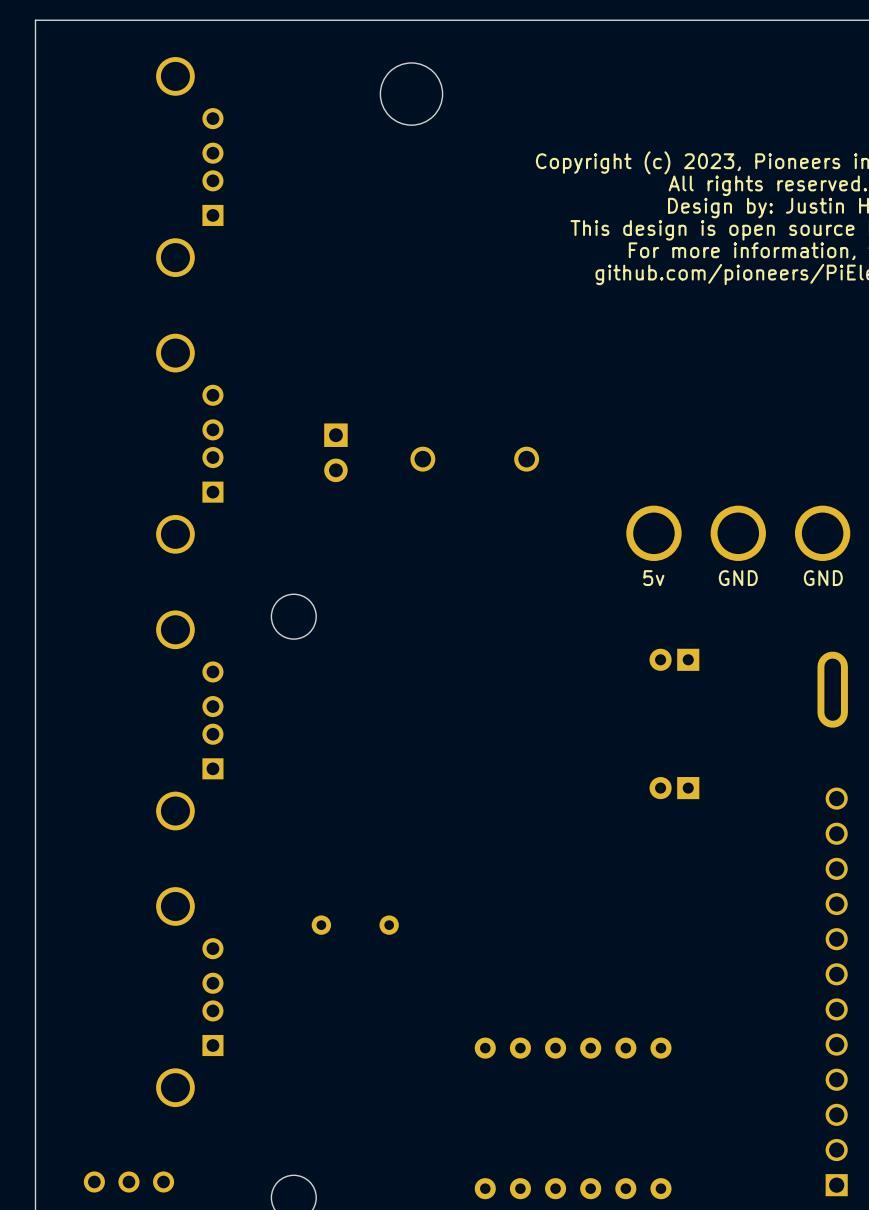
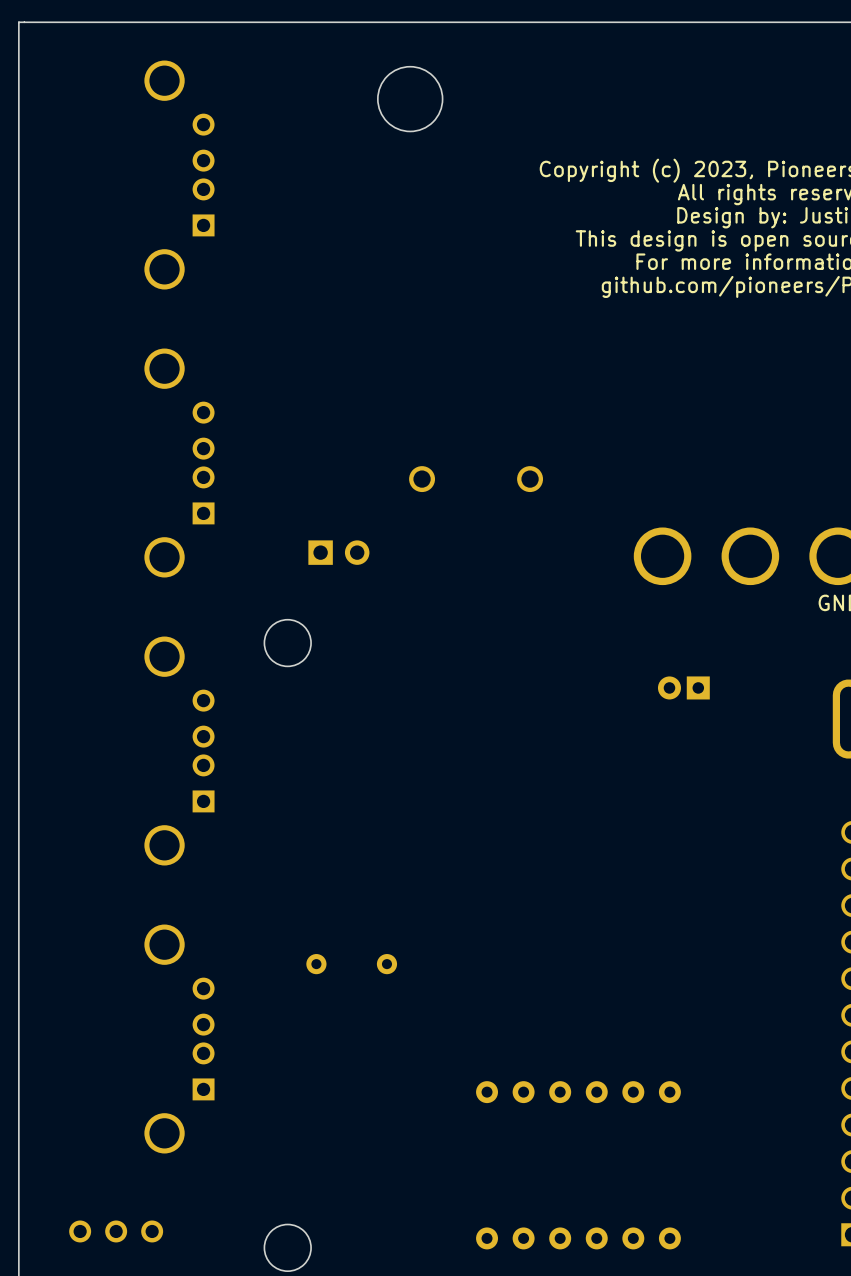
part rotation: 0° (335, 452) -> 90° counterclockwise (338, 552)
part position: (335, 452) -> (338, 552)
text: 5v (653, 578) -> none
text: GND (738, 578) -> none
part: (674, 788) -> none

